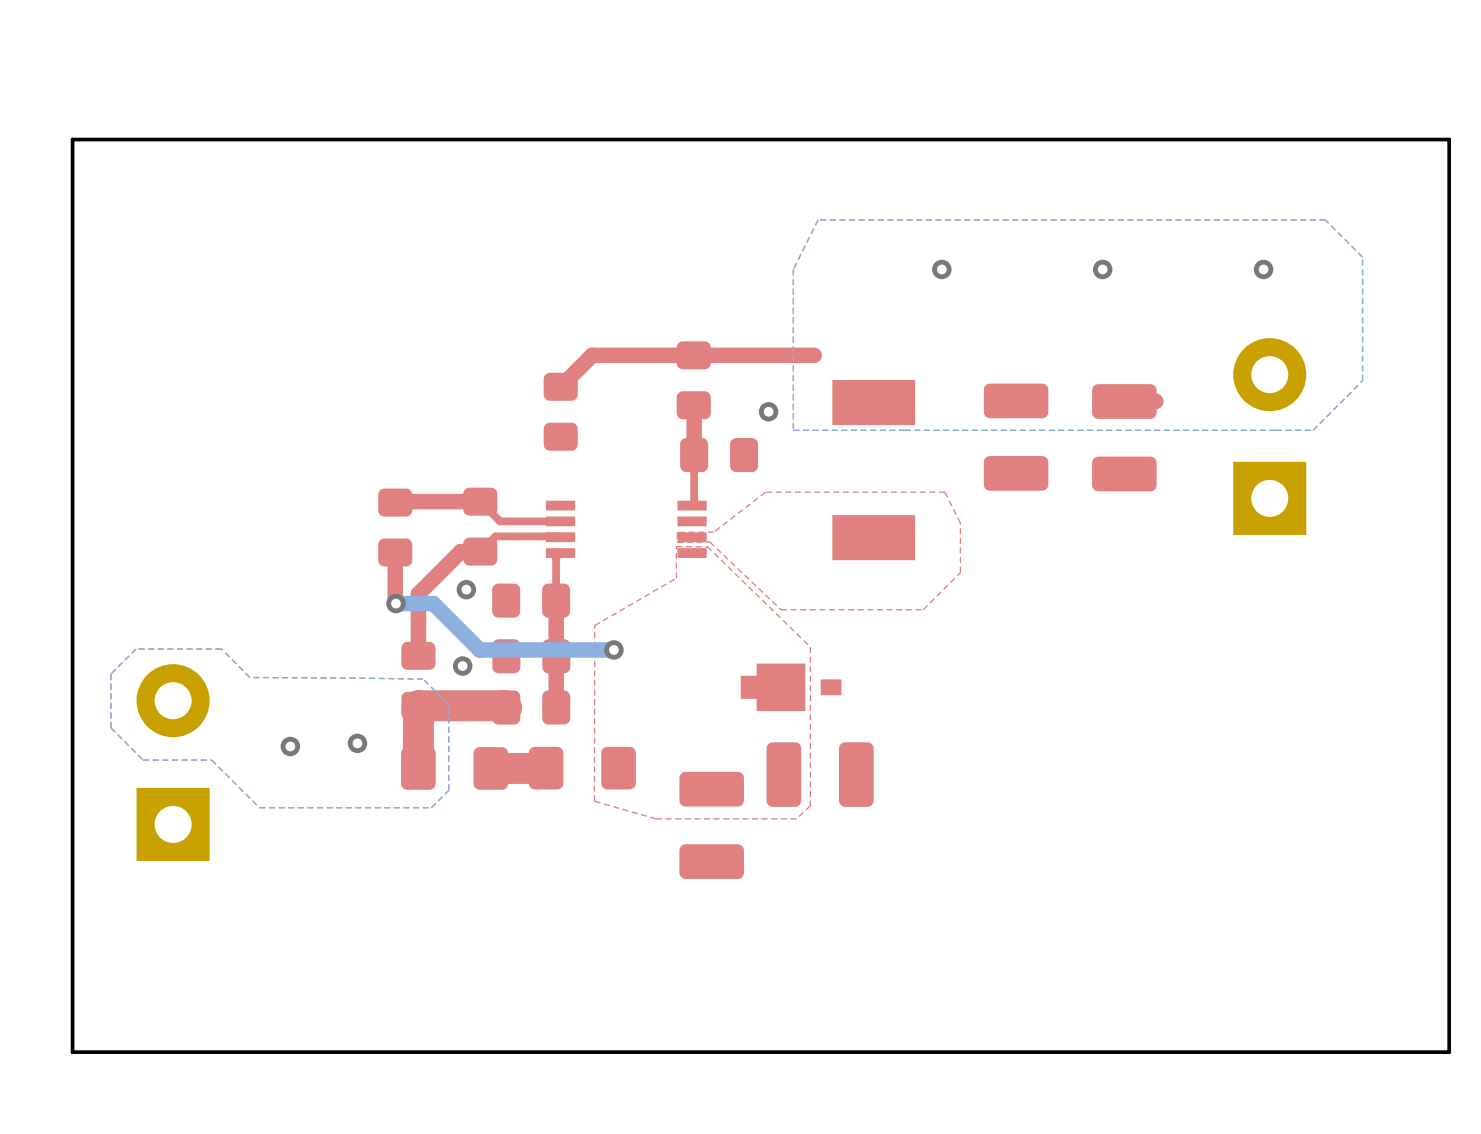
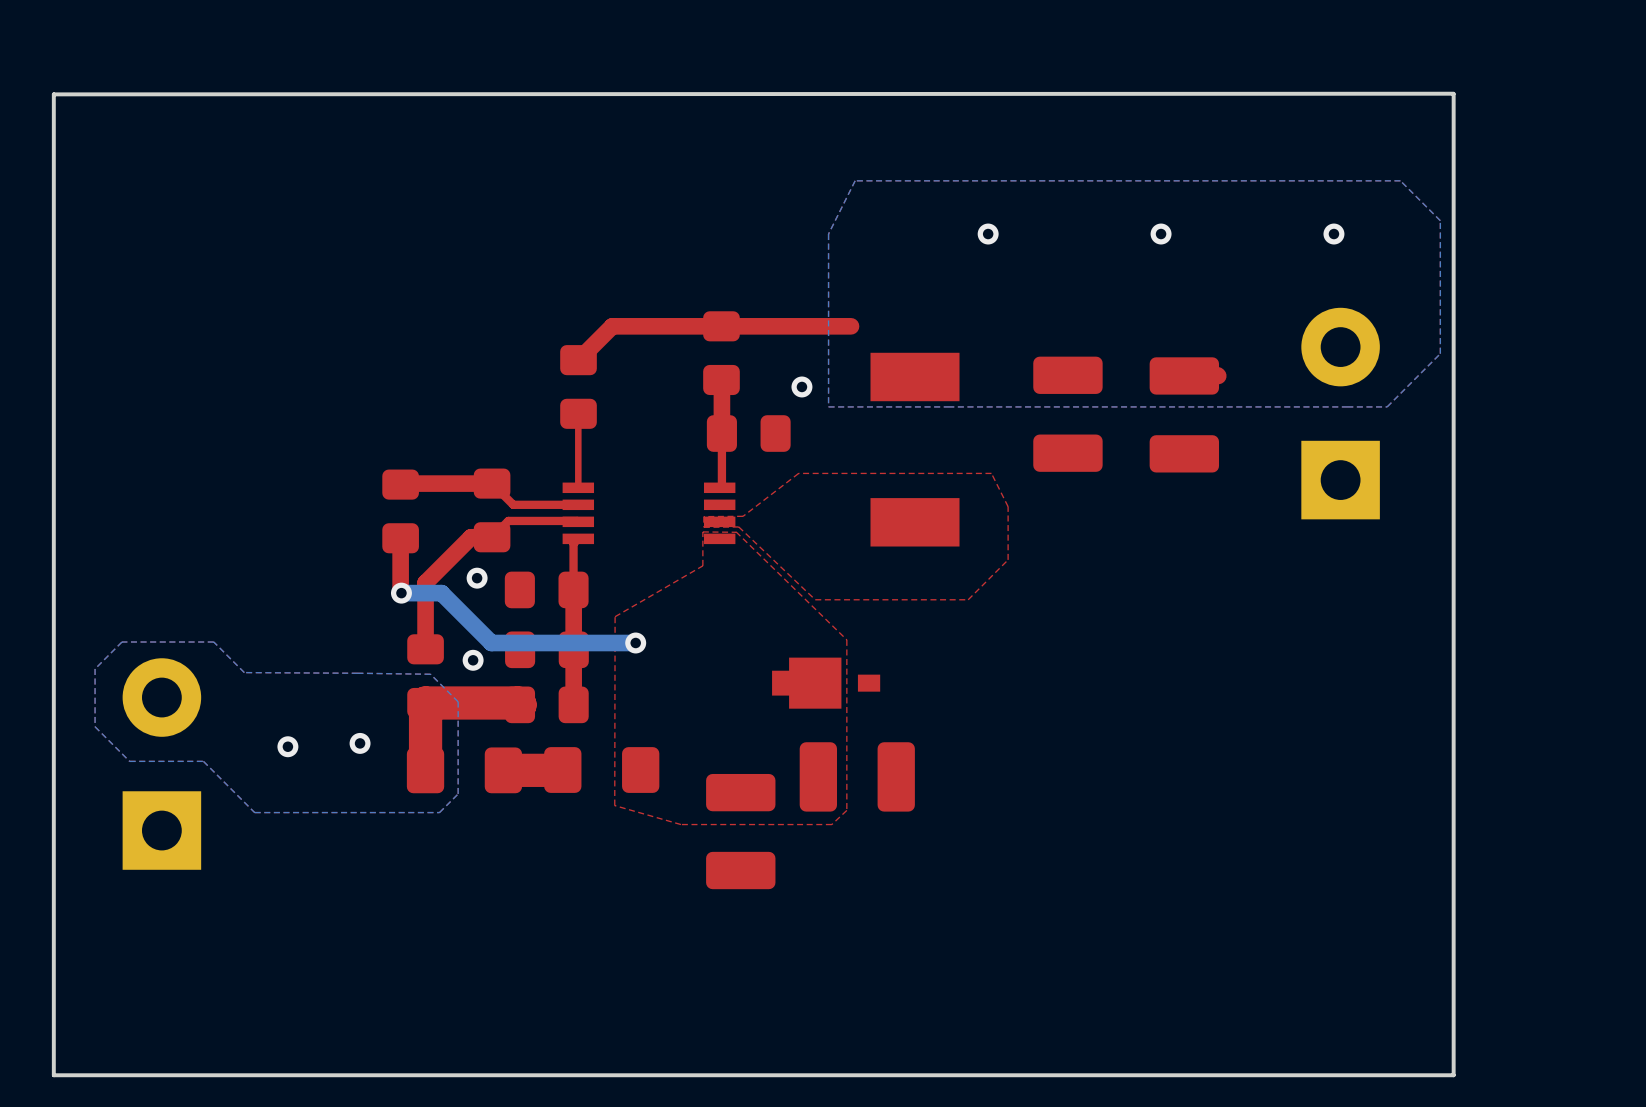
board edge: (72, 139) (1449, 139) (1449, 1052) (1374, 1052) -> (53, 94) (1453, 93)
board edge: none -> (1453, 94) (1453, 1075)
top track: none -> (578, 414) (578, 487)

